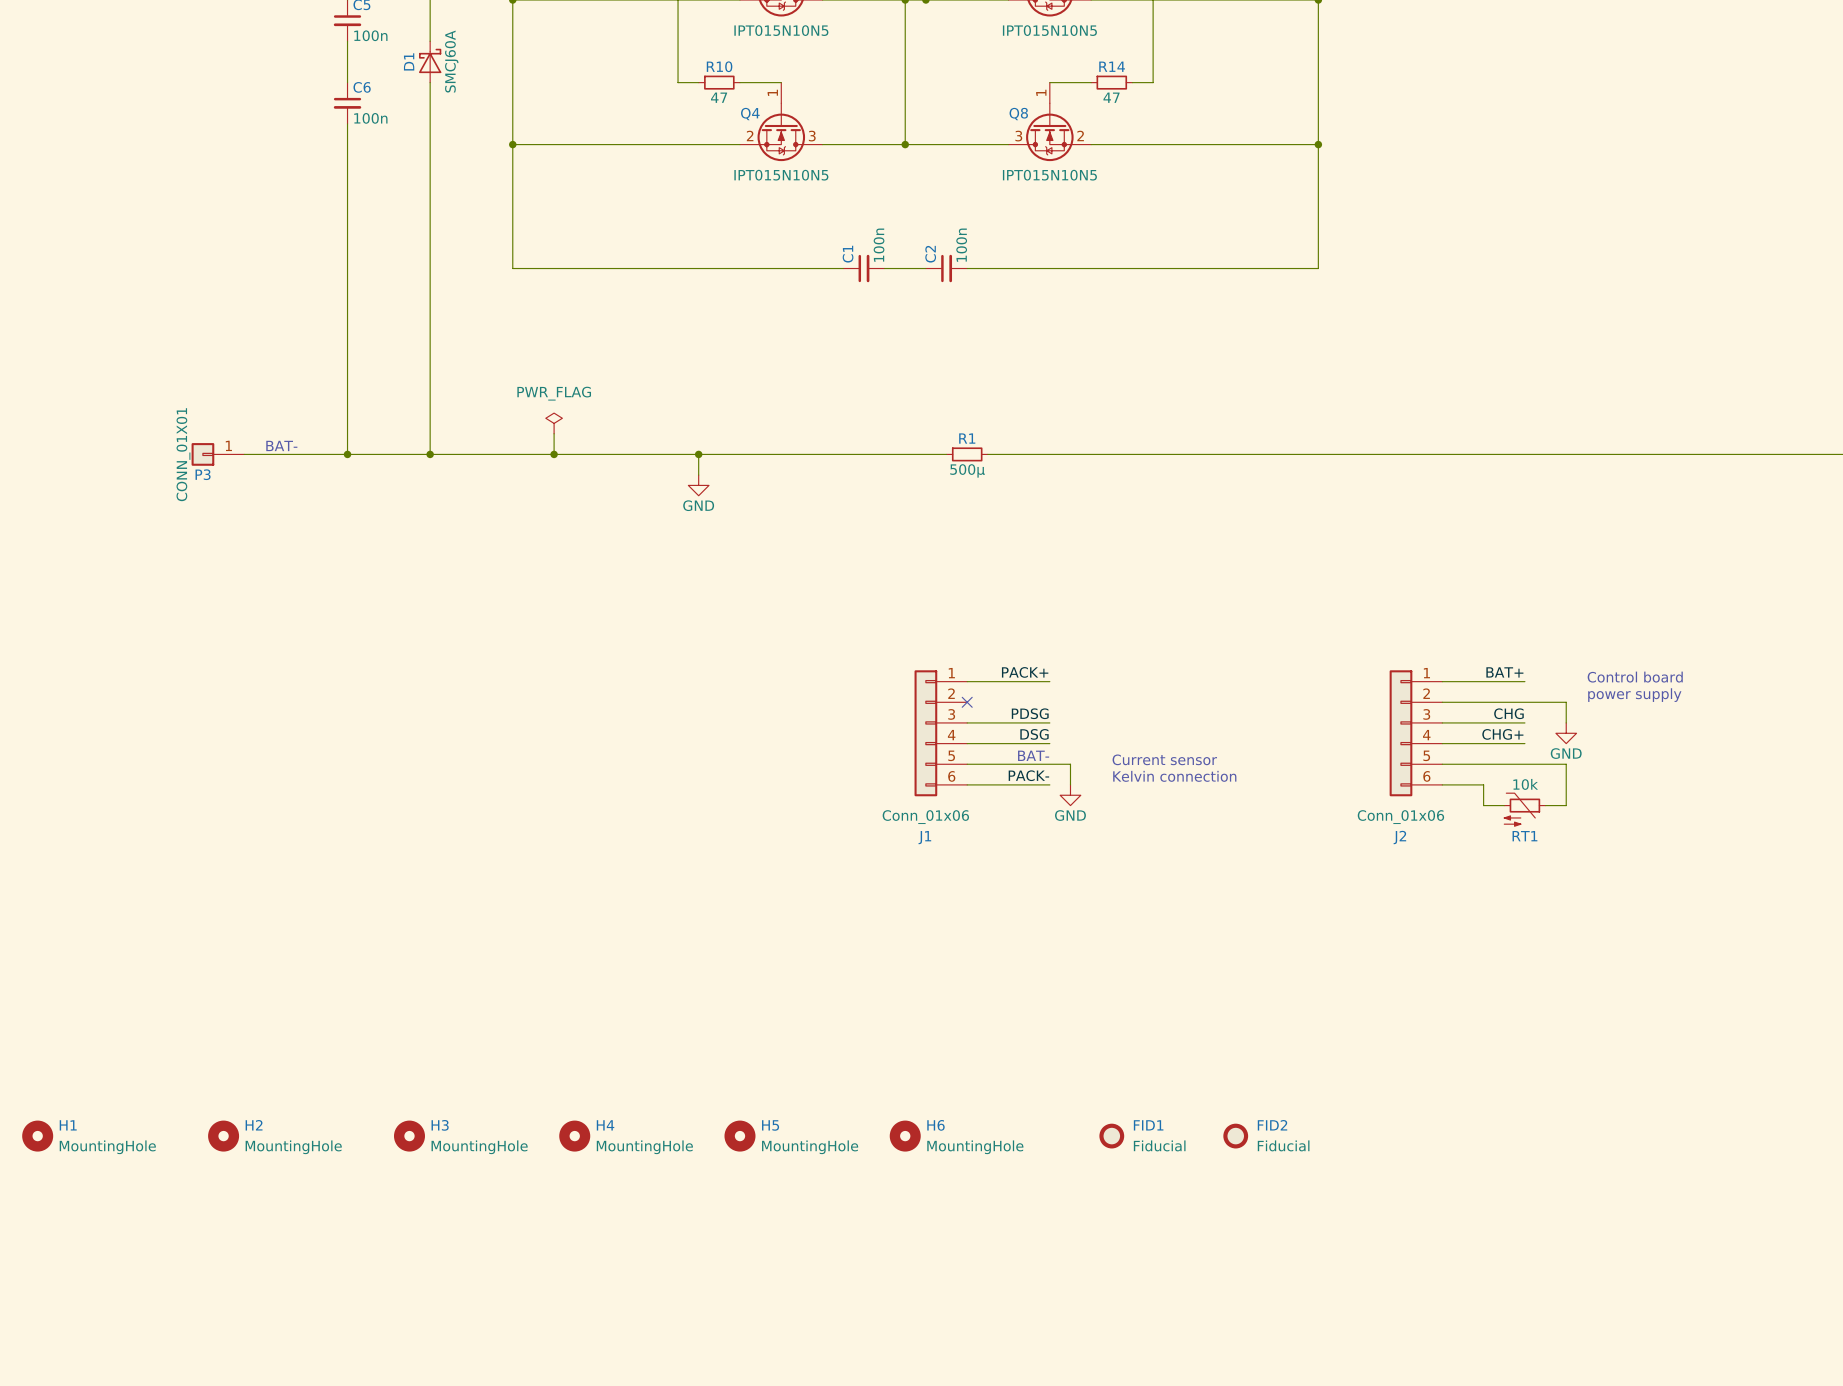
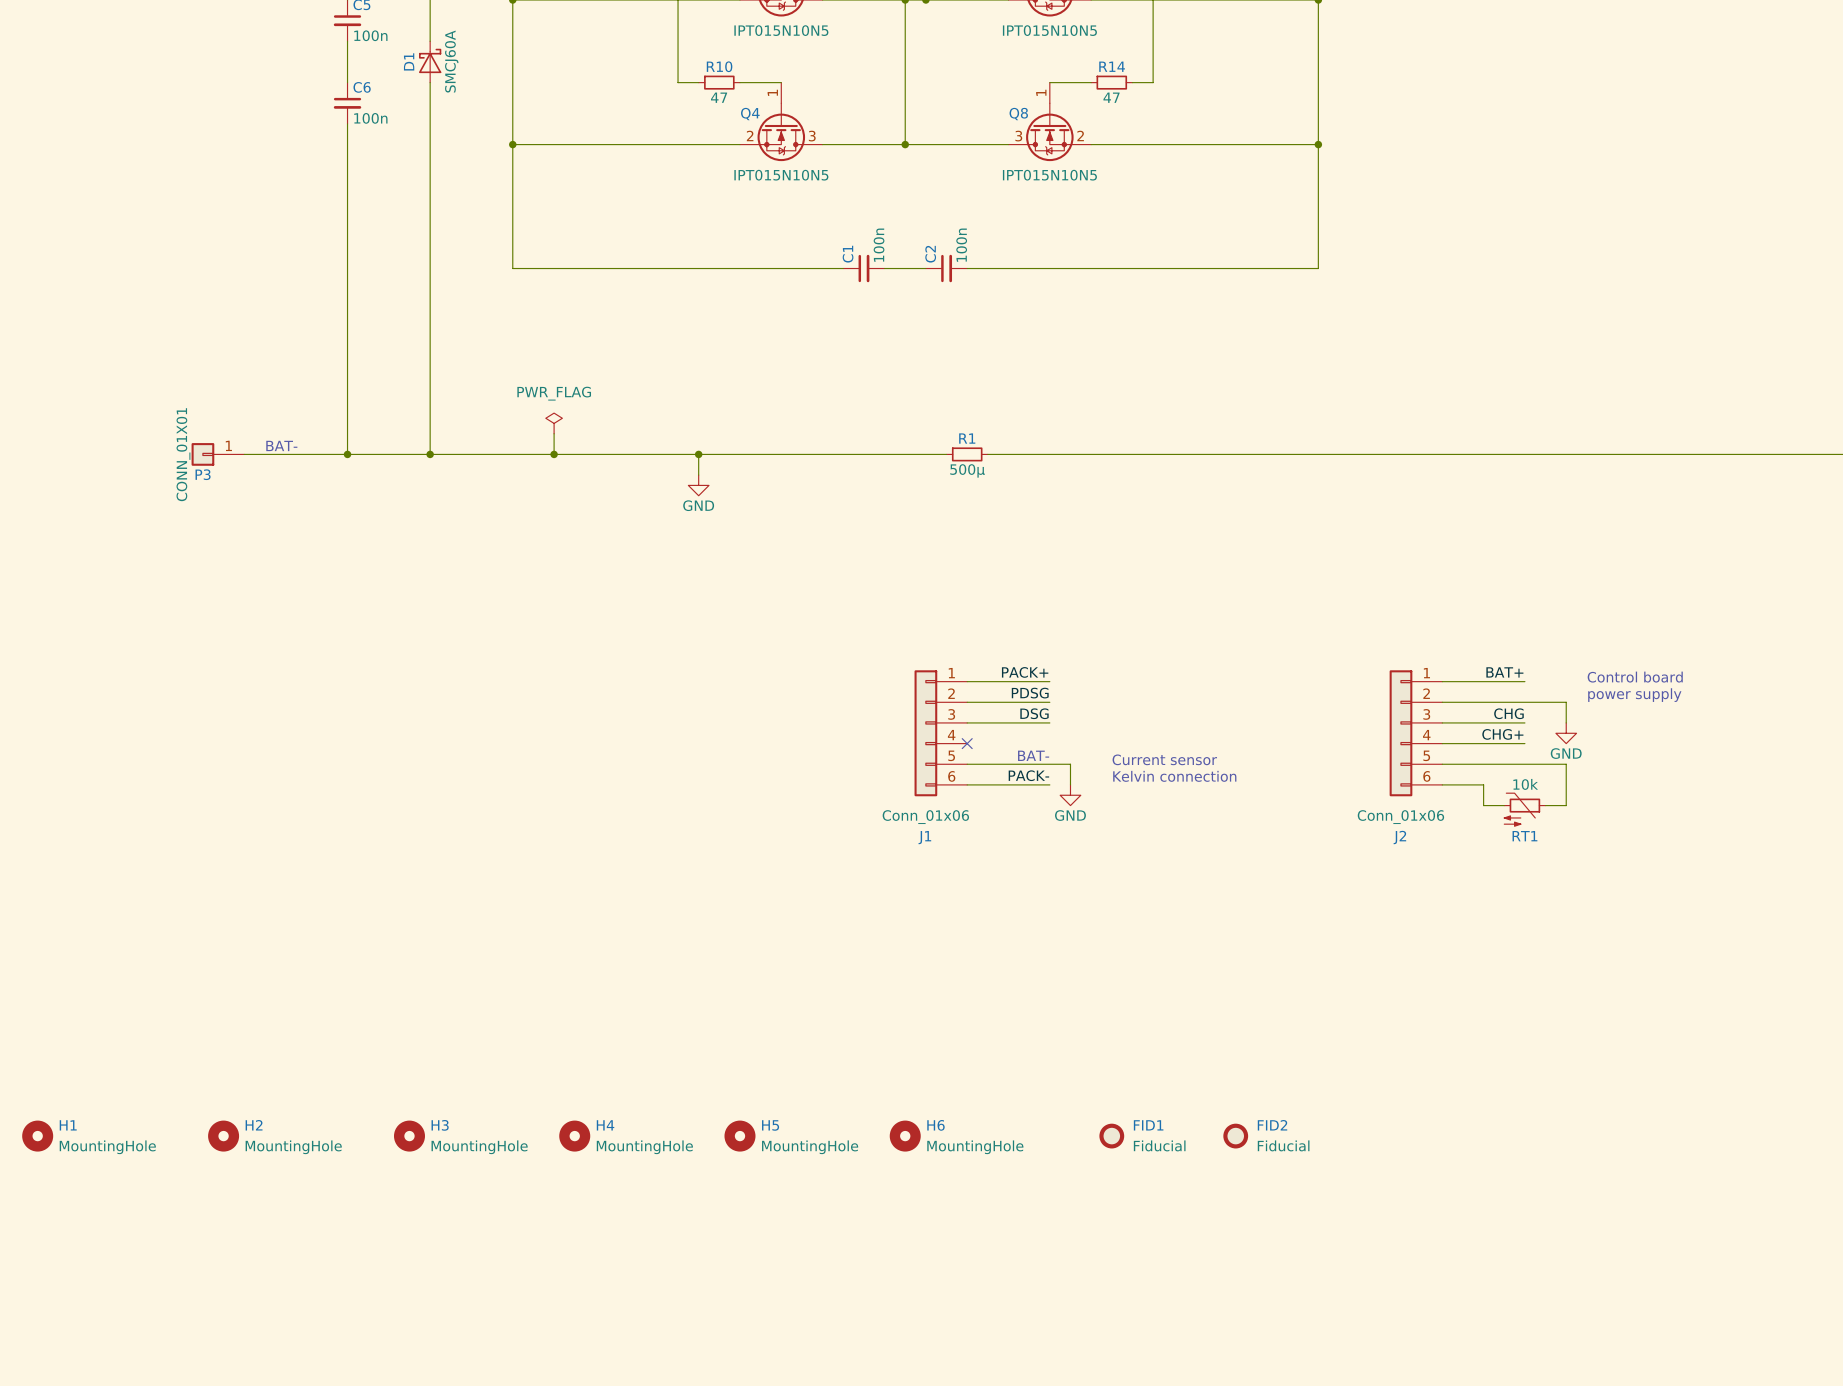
label: none -> PDSG (1030, 693)
no-connect mark position: (967, 702) -> (967, 743)
label: PDSG (1030, 713) -> DSG (1034, 713)
label: DSG (1034, 734) -> none
wire: (967, 743) (1049, 743) -> (967, 702) (1049, 702)

